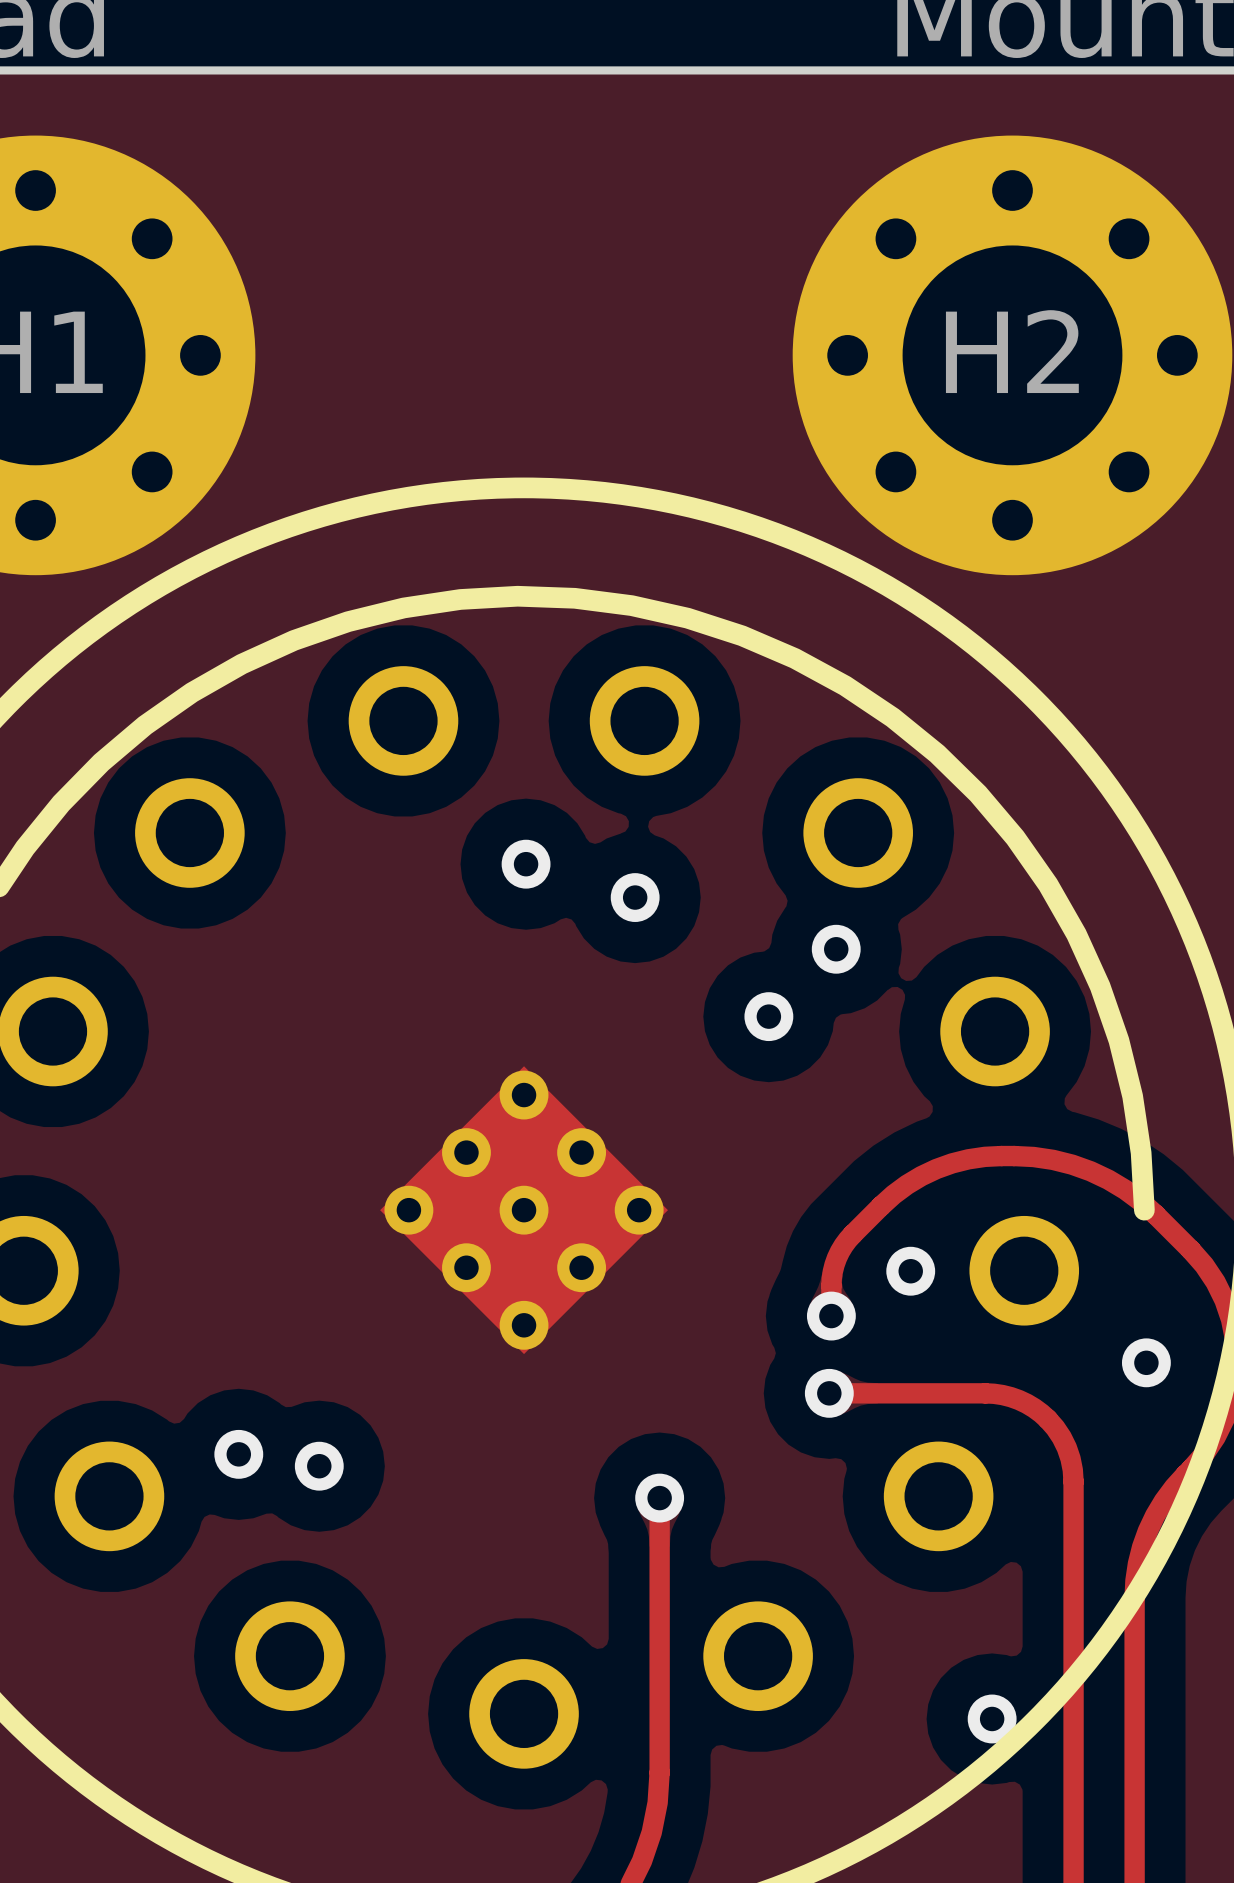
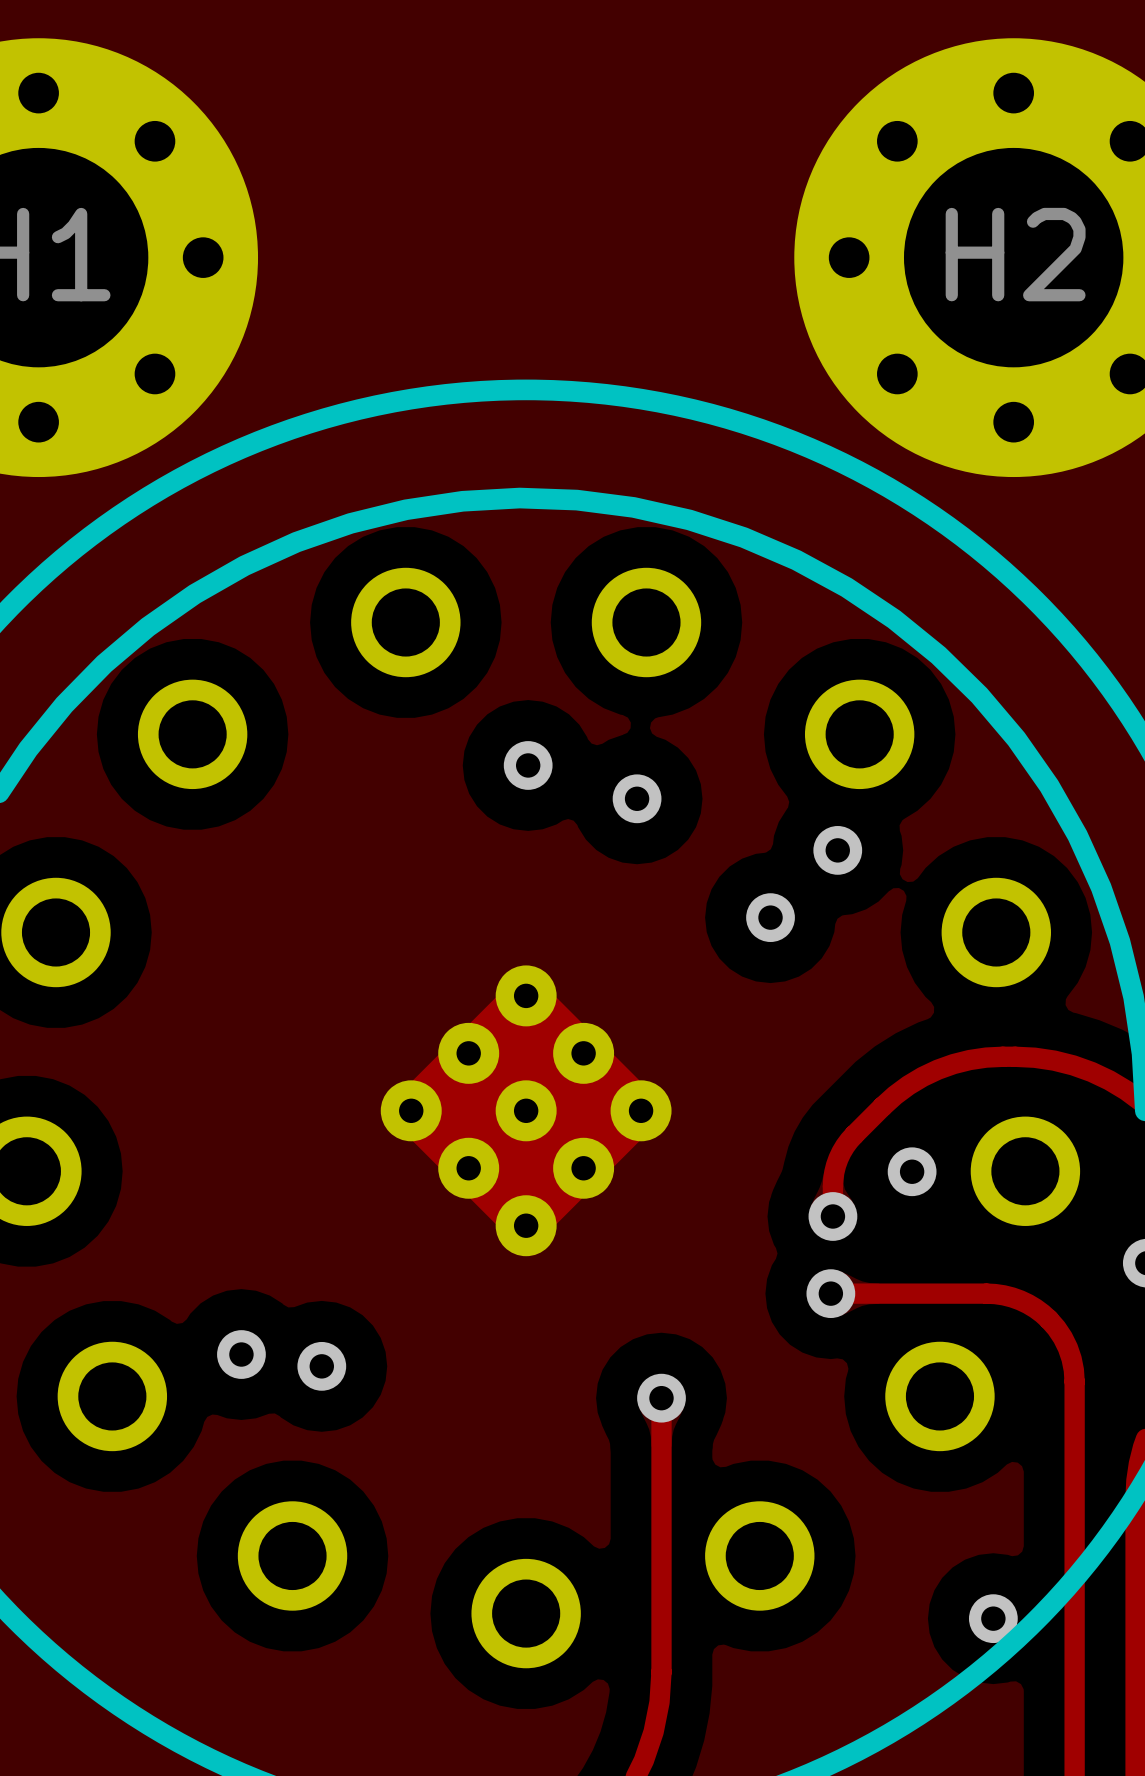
part footprint: [380, 1066, 668, 1355] -> [380, 965, 672, 1257]

